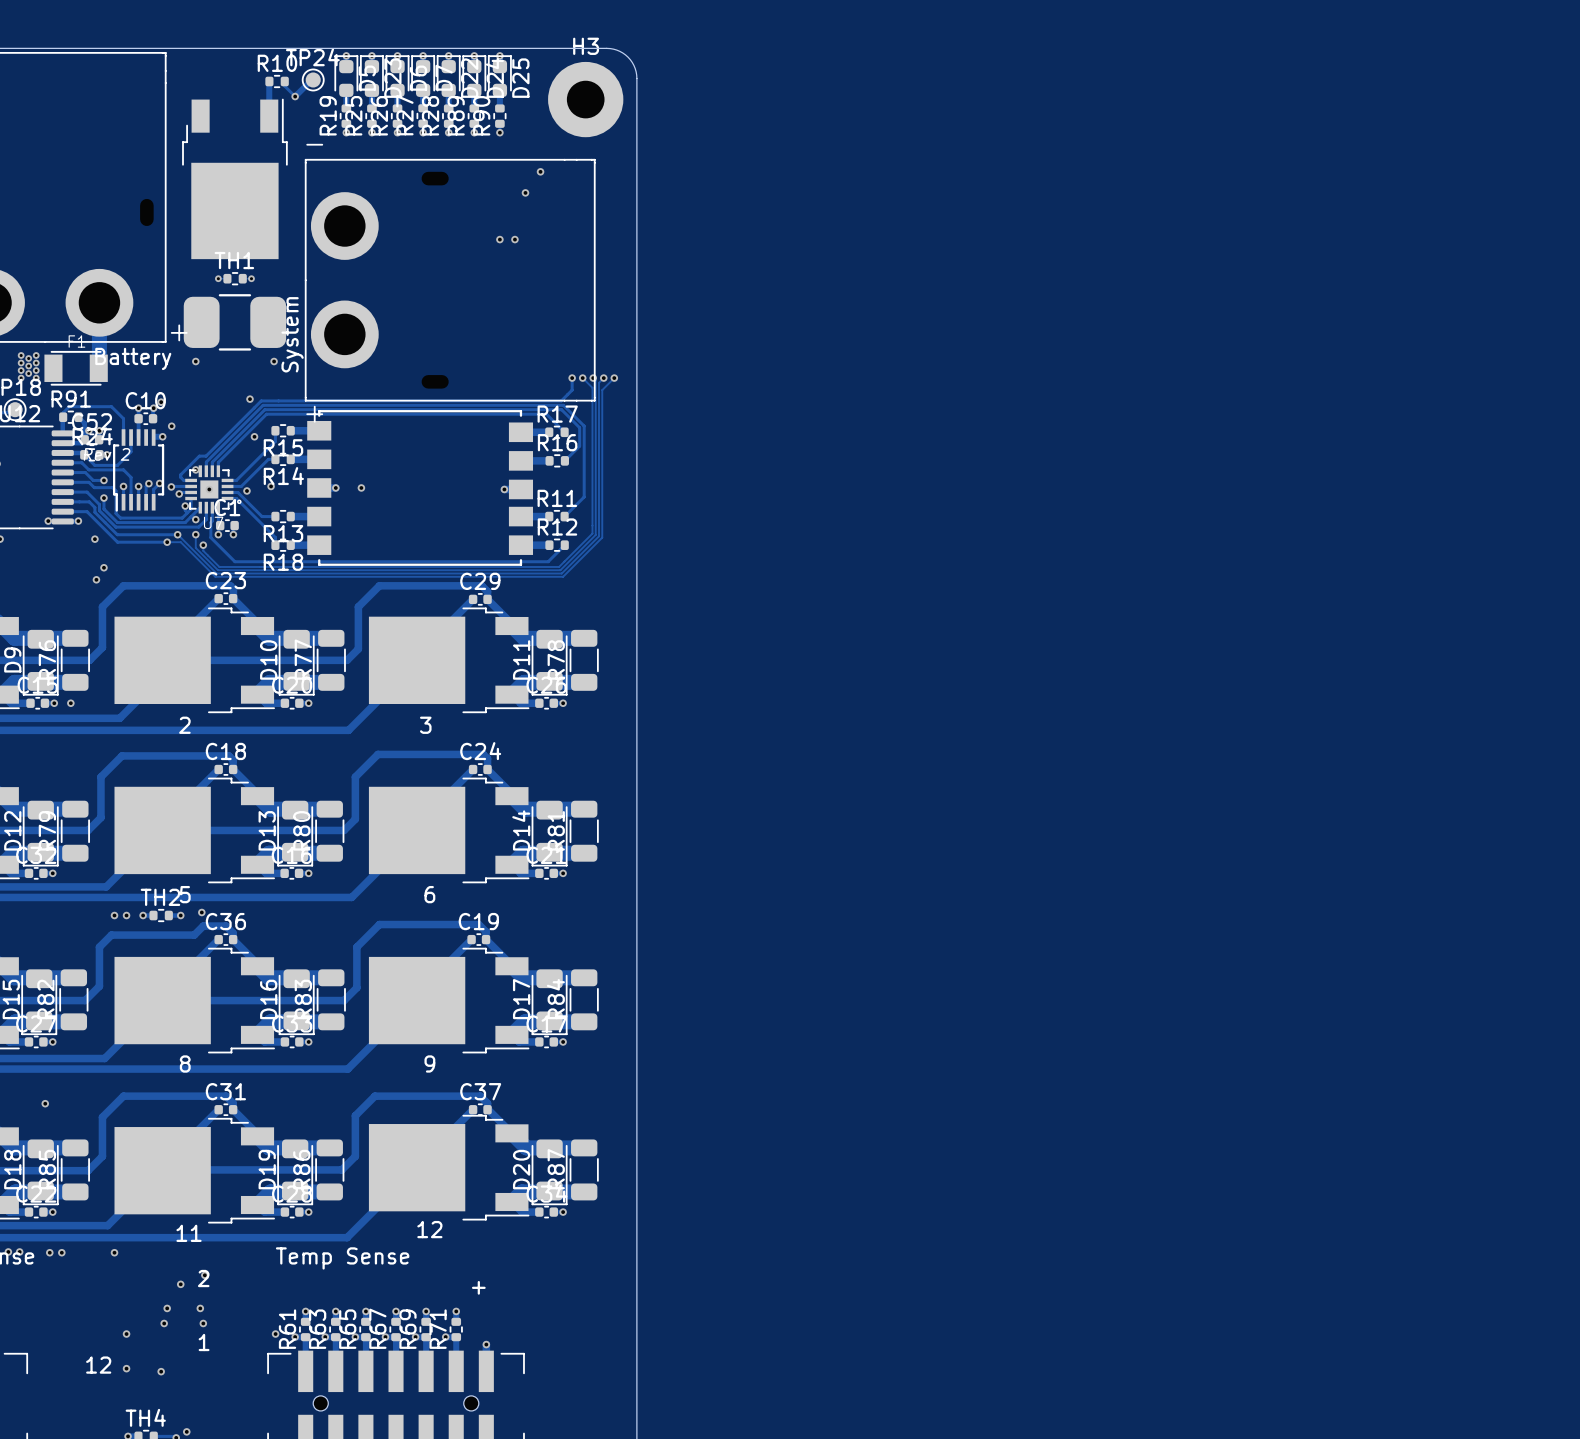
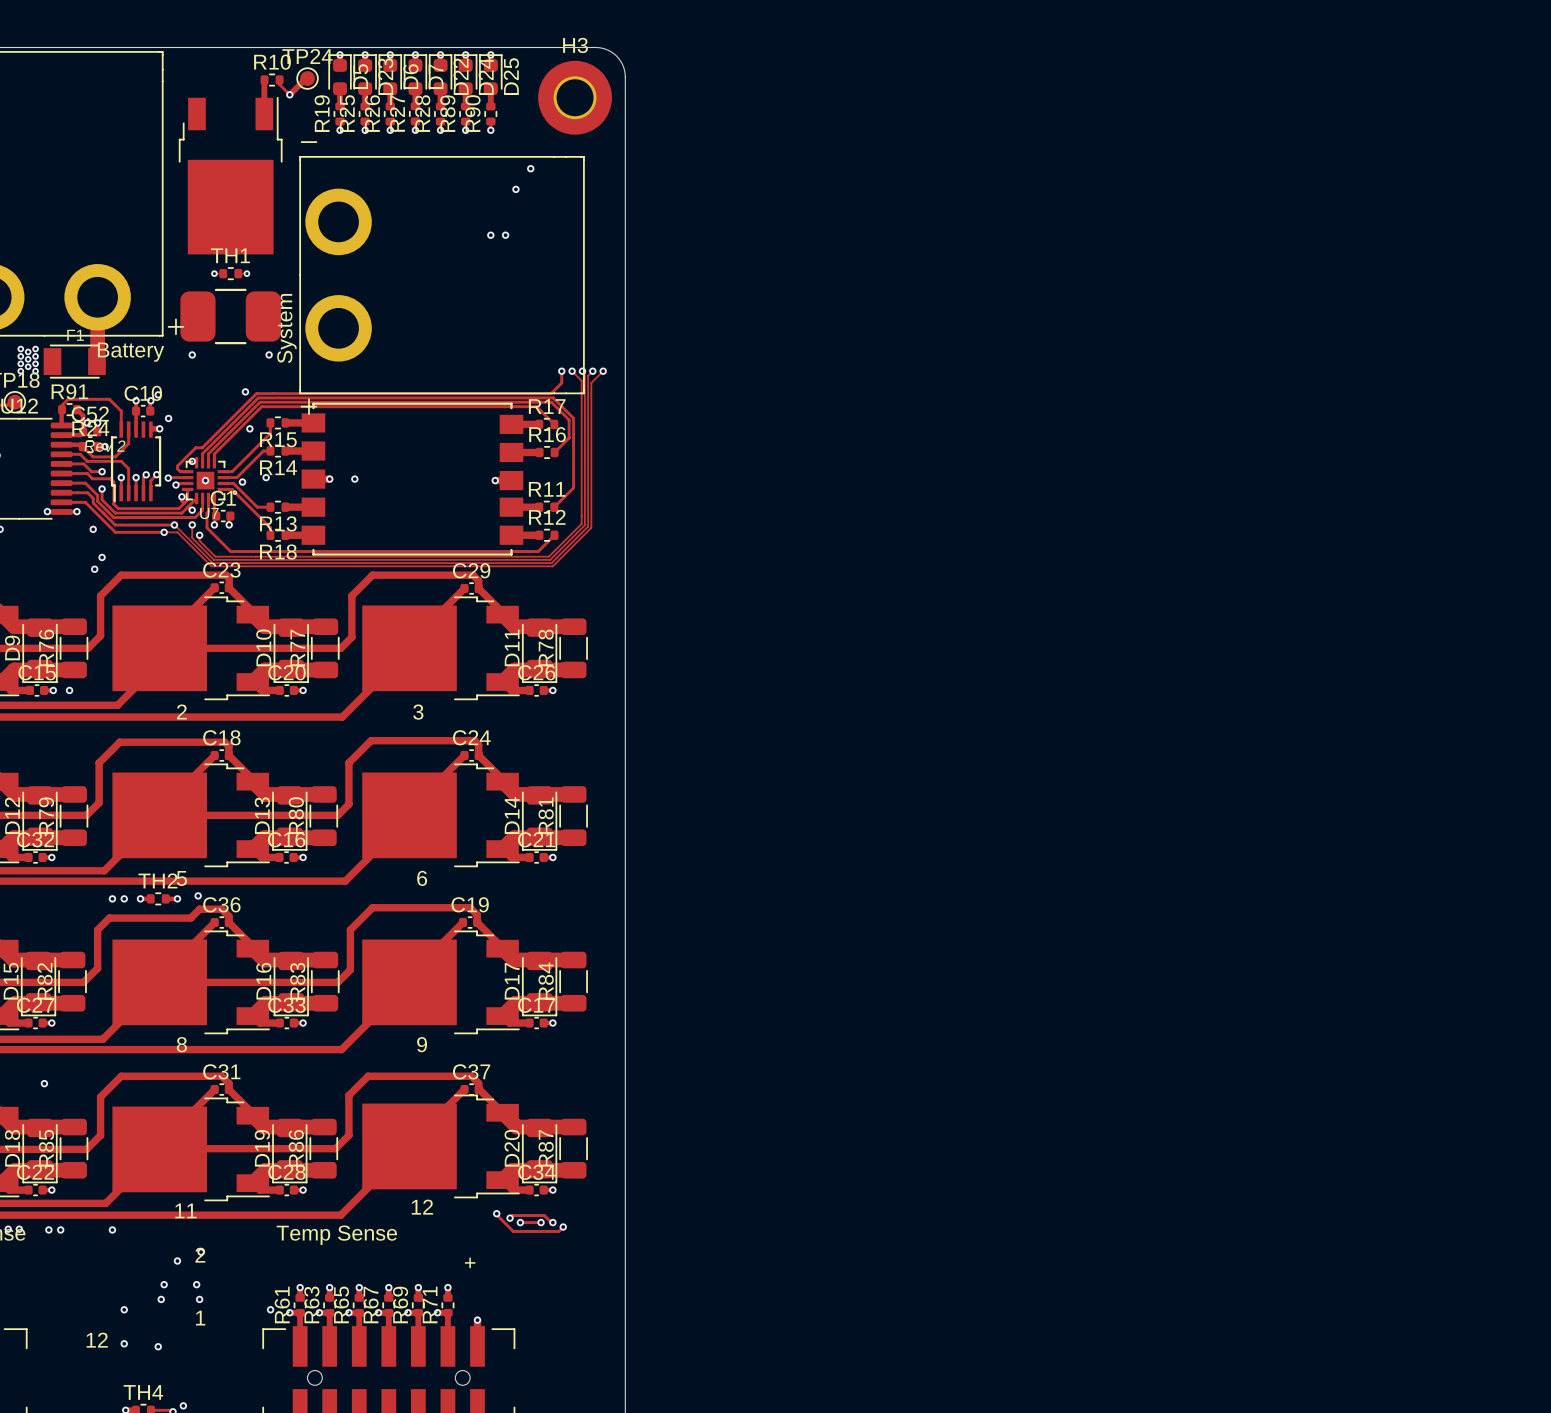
track: none -> (496, 1213) (513, 1231) (558, 1231) (563, 1227)
via: none -> (496, 1213)
track: none -> (510, 1218) (512, 1215) (544, 1215) (552, 1222)
via: none -> (510, 1218)
track: none -> (520, 1222) (541, 1222)
via: none -> (520, 1222)
via: none -> (541, 1222)
via: none -> (552, 1222)
via: none -> (563, 1227)

